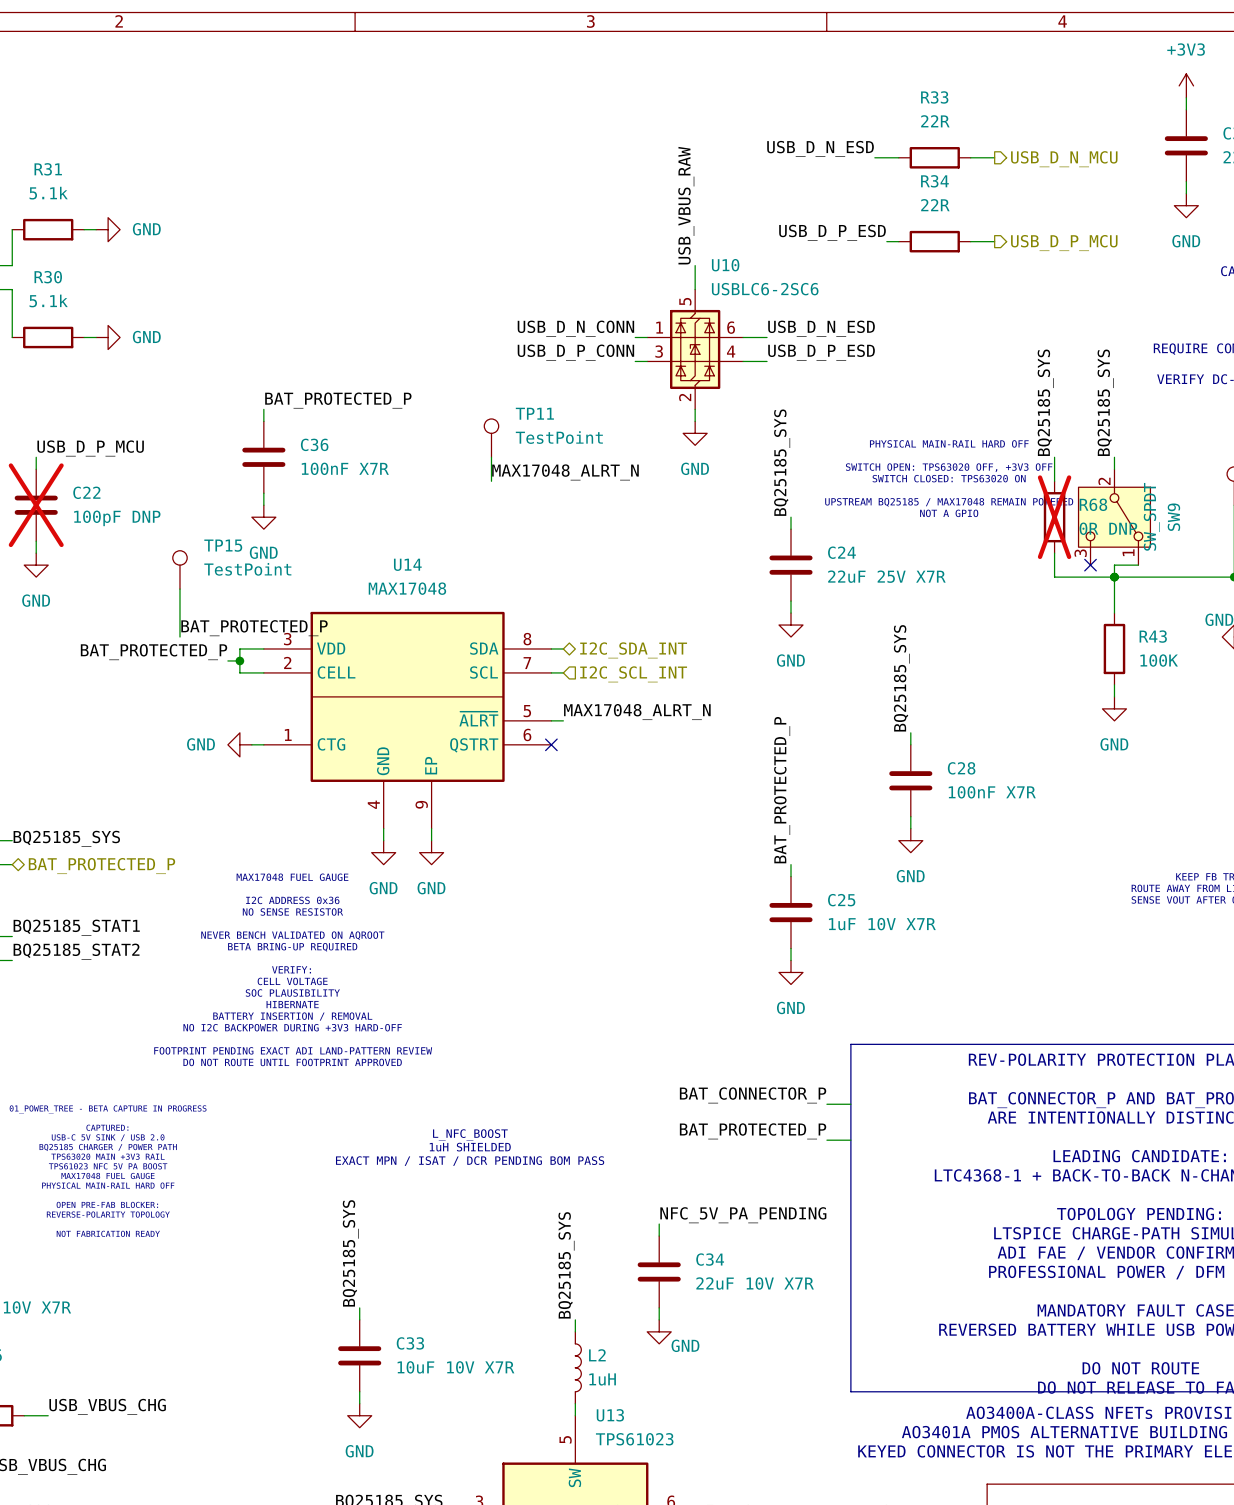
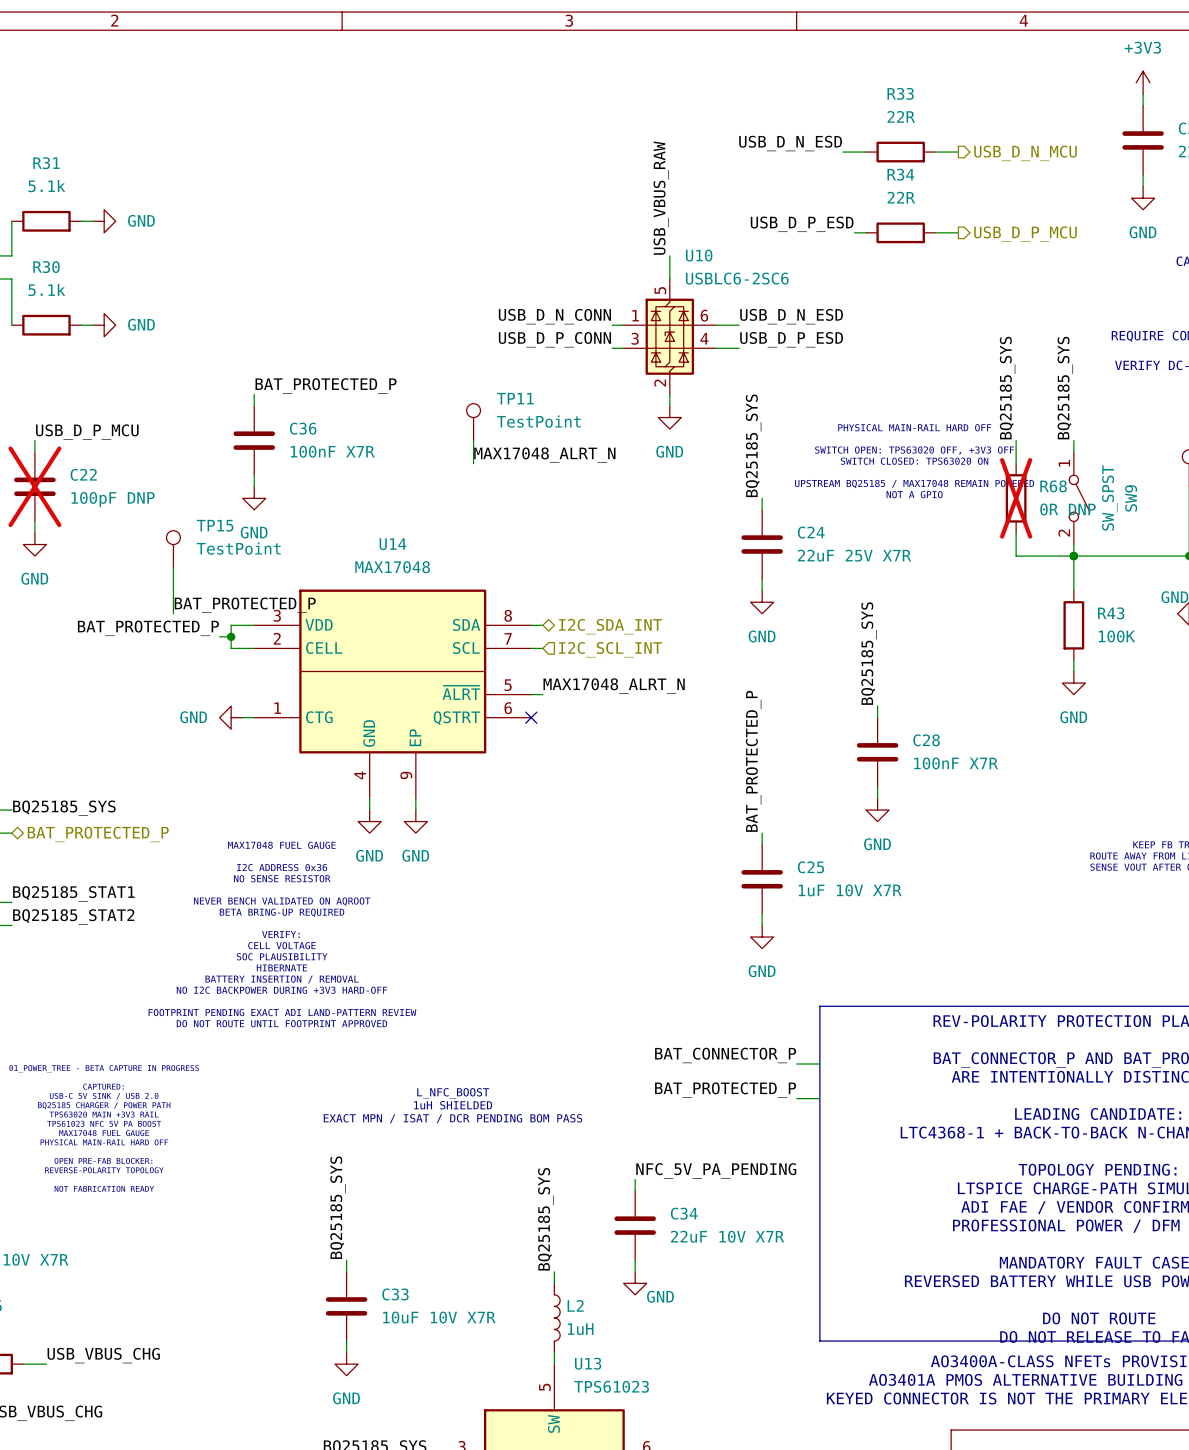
SW9 symbol: [1078, 469, 1151, 566] -> [1069, 452, 1091, 545]
SW9 value: SW_SPDT (1151, 516) -> SW_SPST (1109, 497)
no-connect mark: (1090, 565) -> none
wire: (1114, 565) (1138, 565) -> none

